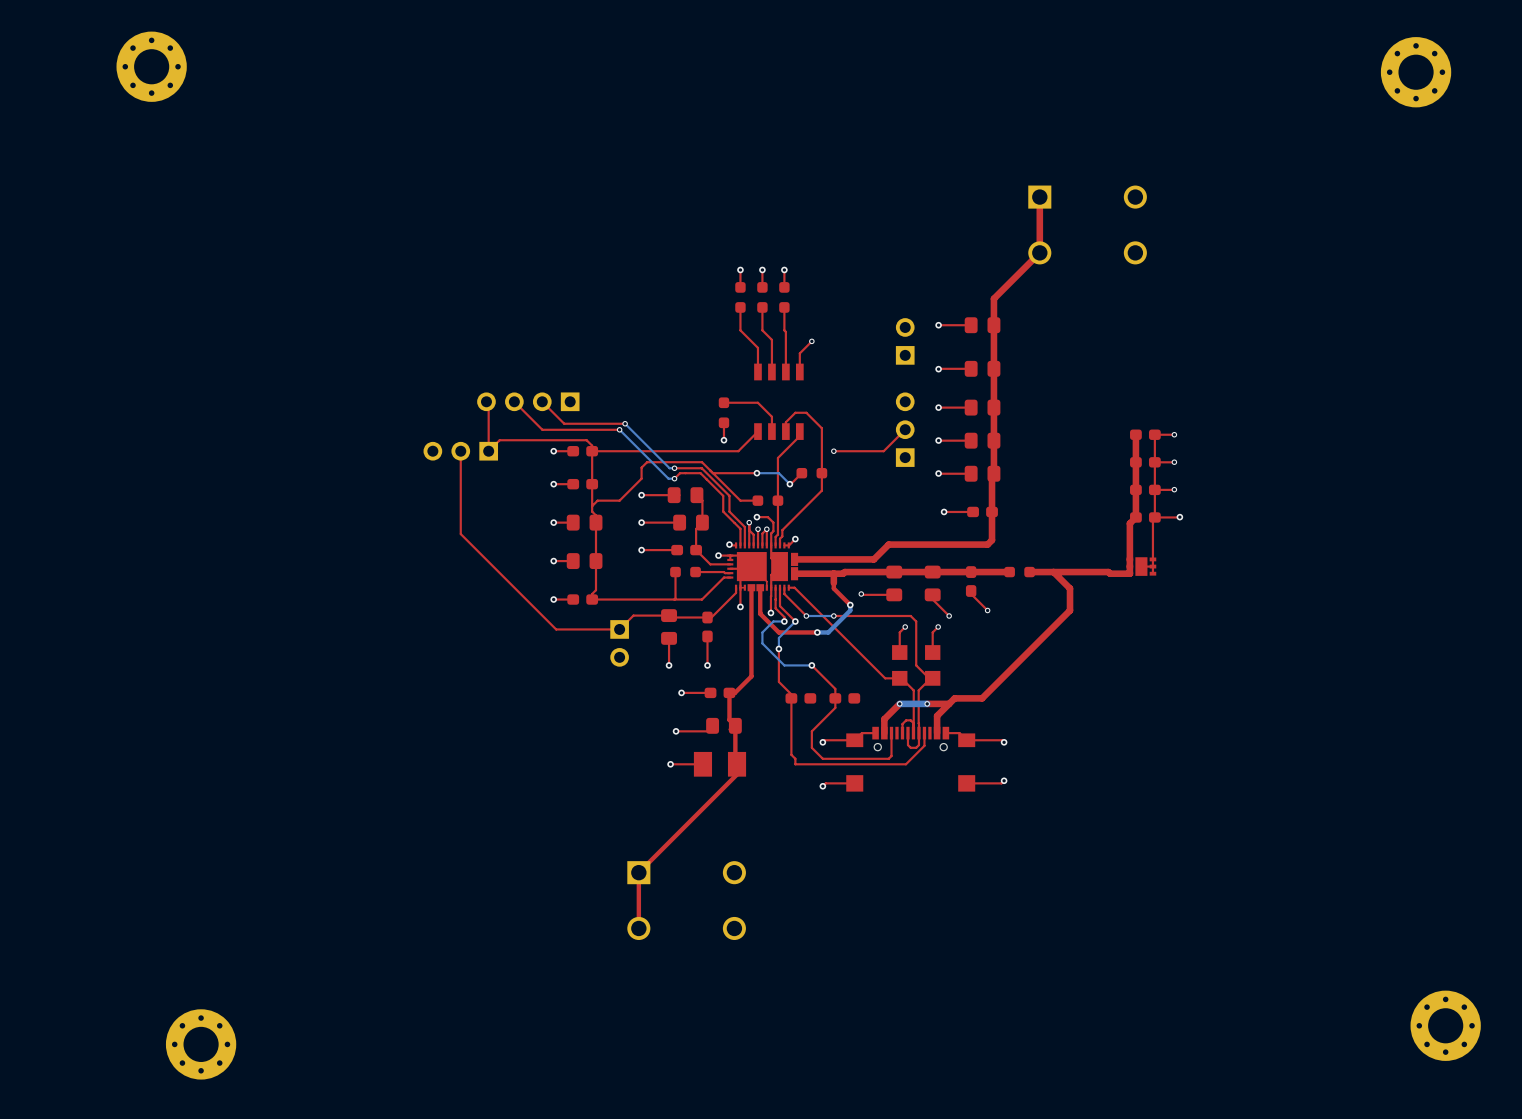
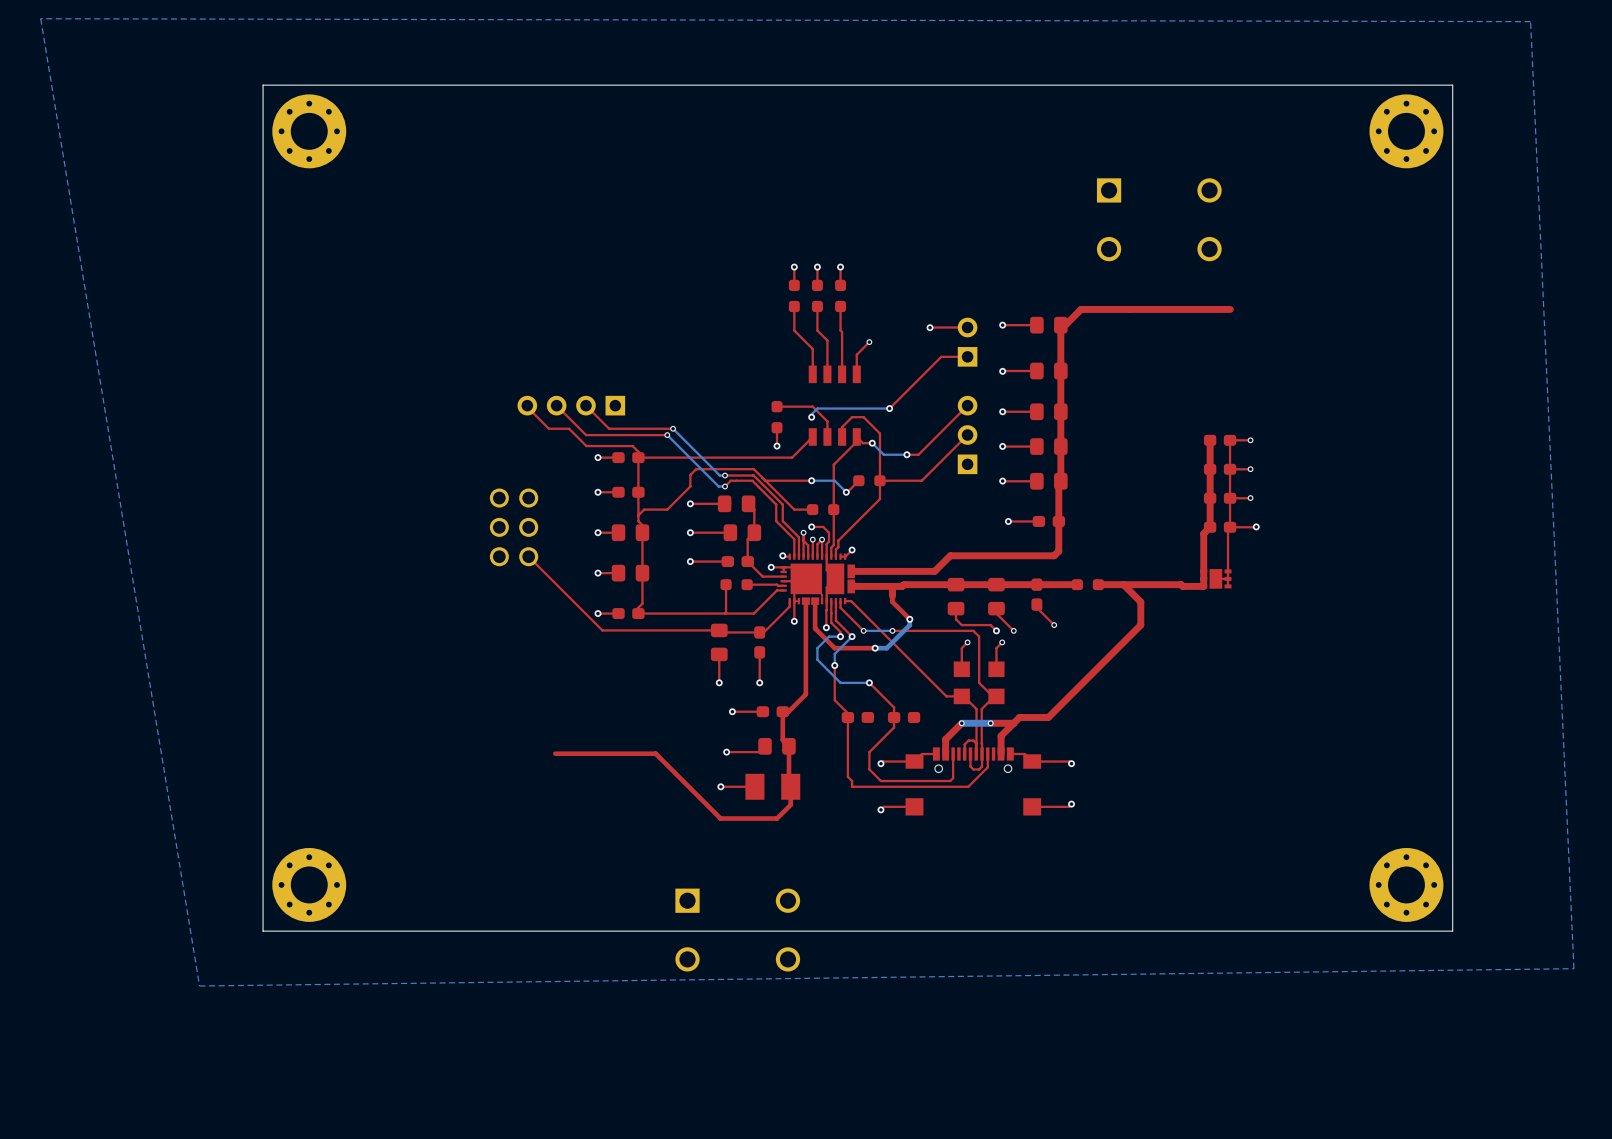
bottom zone outline: none -> (40, 18) (1530, 21) (1573, 968) (199, 986) (40, 18)
part position: (151, 66) -> (309, 131)
part position: (1416, 72) -> (1406, 131)
board edge: none -> (1452, 85) (263, 85) (263, 931) (1452, 931) (1452, 85)
top track: (1039, 197) (1039, 252) (993, 298) (993, 325) -> (1230, 309) (1081, 309) (1065, 325) (1060, 325)
via: none -> (930, 327)
top track: none -> (967, 327) (930, 327)
top track: none -> (967, 356) (941, 356) (889, 408)
top track: (486, 401) (488, 403) (488, 451) (499, 440) (542, 440) -> (527, 405) (548, 428) (569, 428) (586, 446)
top track: none -> (967, 405) (918, 454) (906, 454)
bottom track: none -> (889, 408) (817, 408) (811, 414) (811, 417)
via: none -> (889, 408)
via: none -> (811, 417)
top track: none -> (856, 436) (862, 443) (872, 443)
bottom track: none -> (872, 443) (883, 454) (906, 454)
via: none -> (872, 443)
via: none -> (906, 454)
top track: (460, 451) (460, 534) (556, 629) (619, 629) (633, 615) -> (528, 556) (602, 630) (681, 630)
part: (460, 451) -> none
via: (833, 451) -> none
top track: (883, 451) (833, 451) -> (944, 457) (921, 480) (879, 480)
part: none -> (514, 527)
top track: (861, 594) (894, 594) -> (996, 630) (990, 625) (961, 625) (956, 619) (956, 608)
via: (861, 594) -> none
via: none -> (996, 630)
part: (619, 643) -> none
top track: (737, 774) (638, 872) (638, 928) -> (790, 797) (790, 804) (777, 818) (720, 818) (655, 753) (555, 753)
part position: (1445, 1025) -> (1406, 884)
part position: (201, 1044) -> (309, 884)

